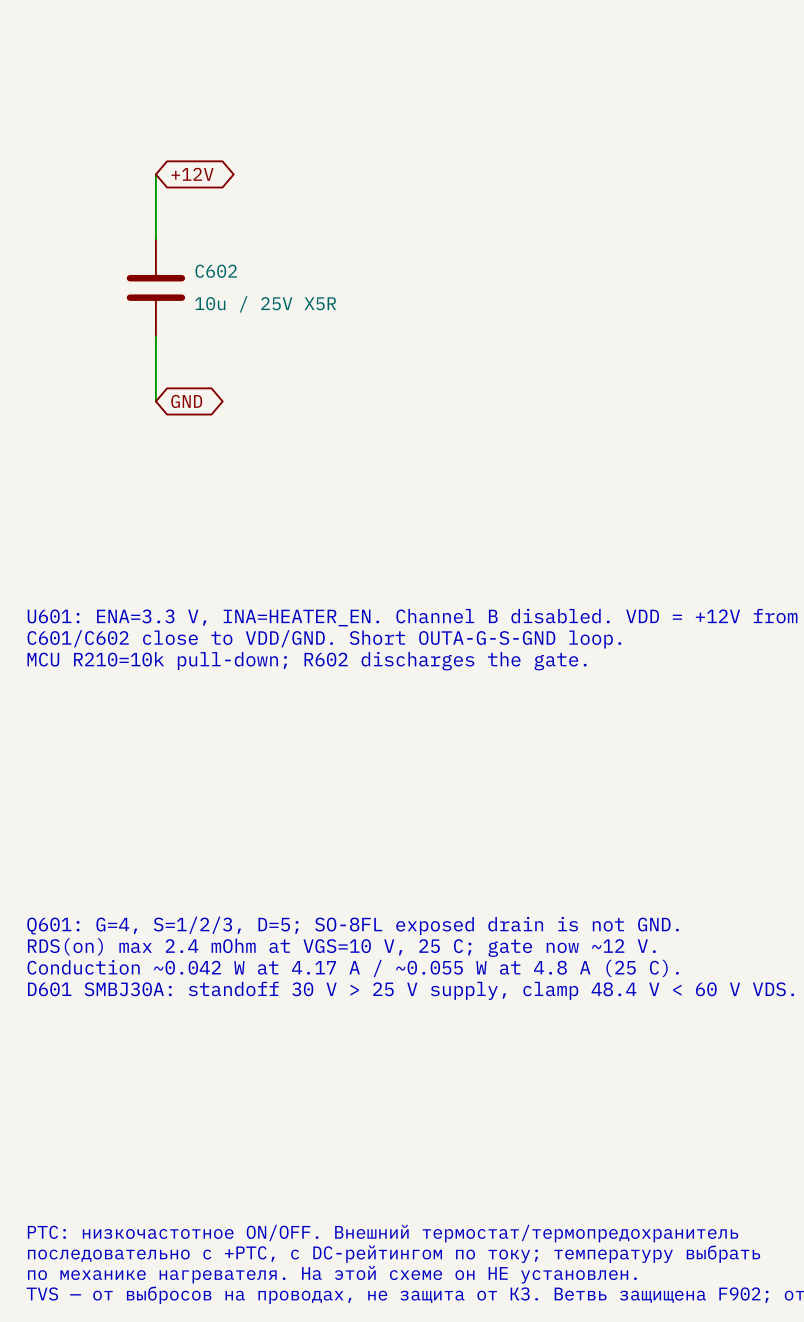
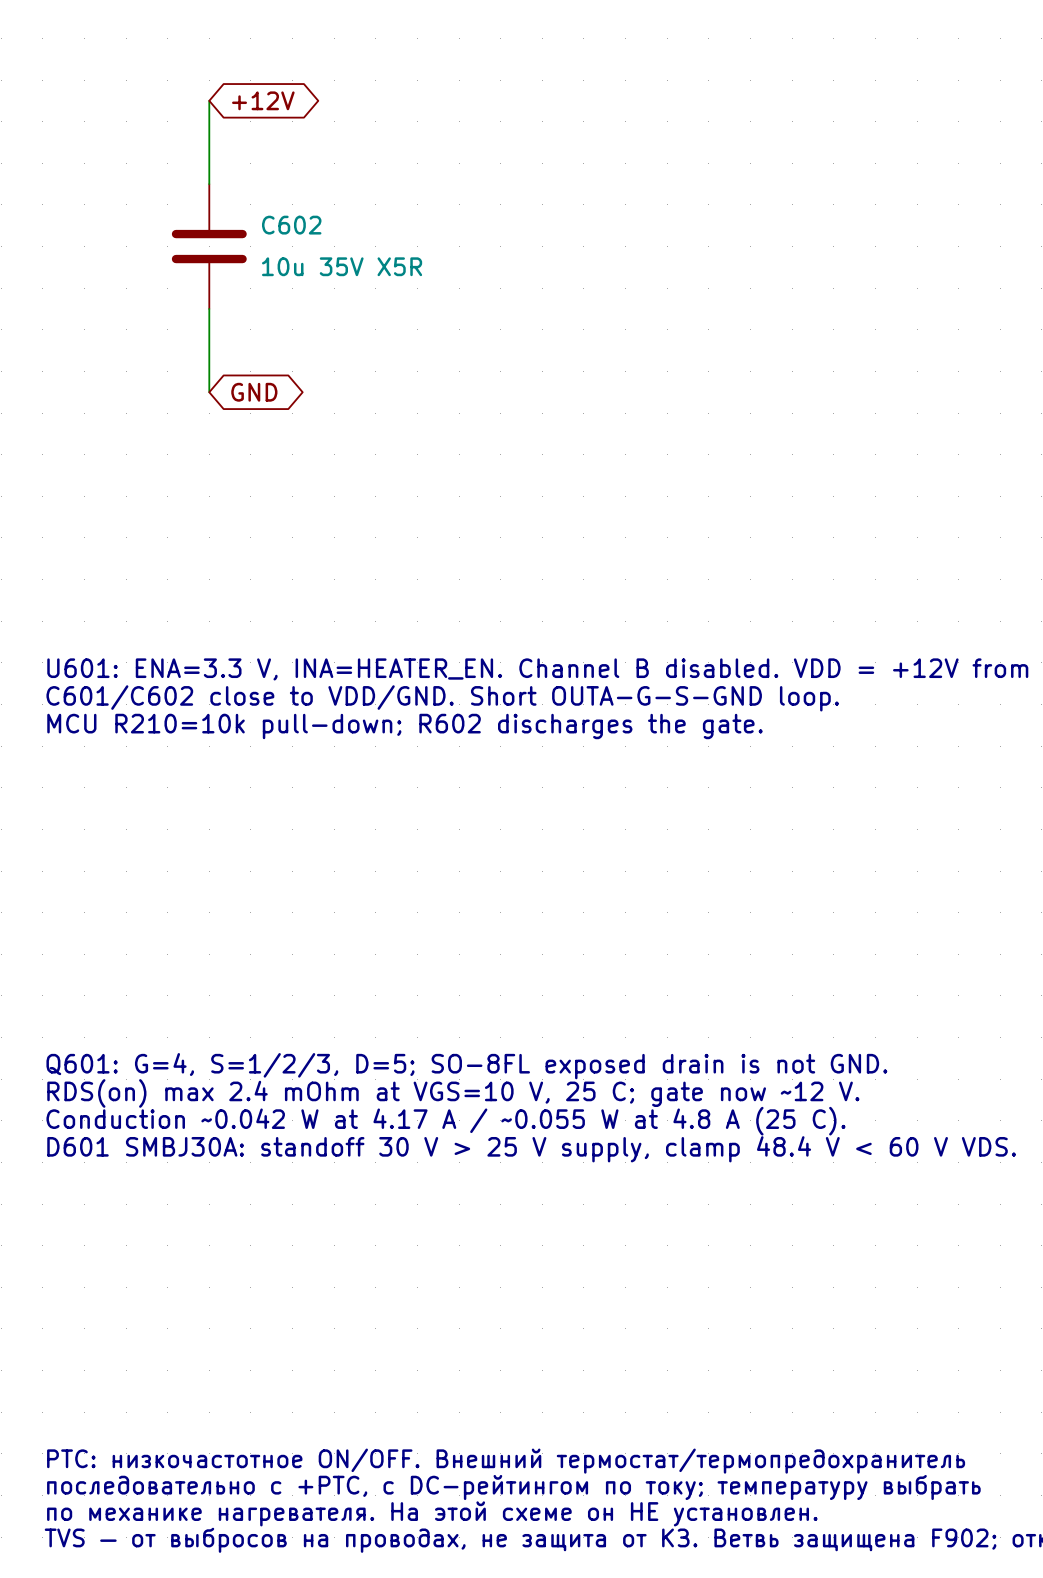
C602 value: 10u / 25V X5R (265, 304) -> 10u 35V X5R (342, 266)

